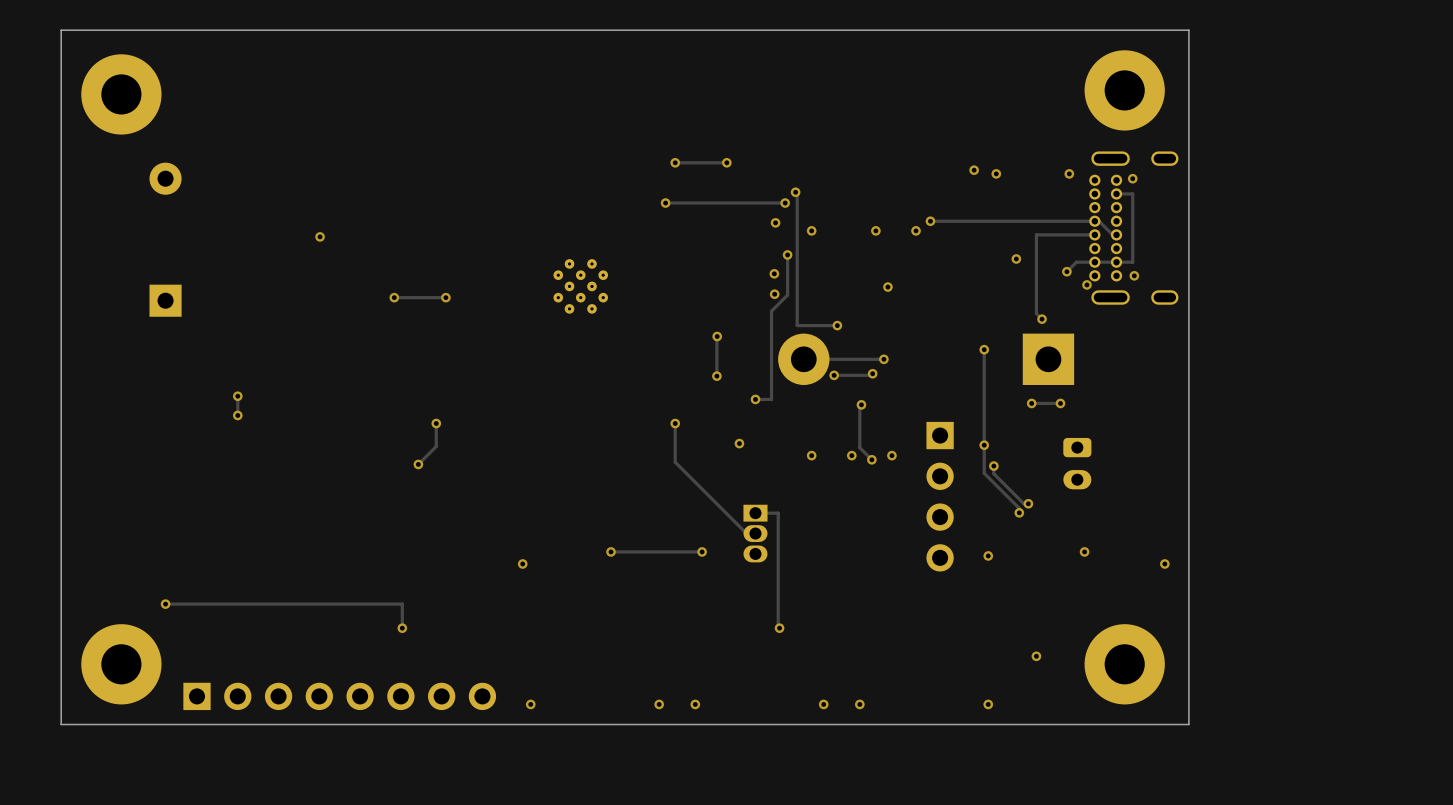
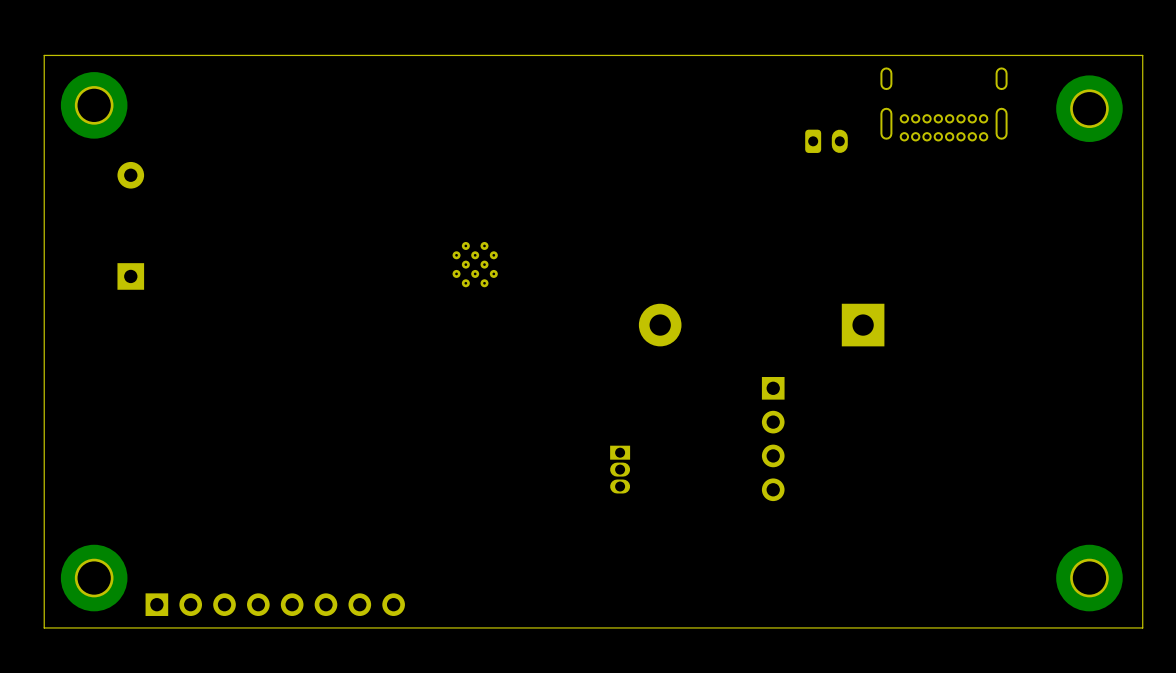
board edge: (61, 34) (61, 30) (1188, 30) (1188, 724) -> (44, 55) (1142, 55) (1142, 627) (979, 627)
part position: (1124, 90) -> (1089, 108)
via: (675, 162) -> none
track: (726, 162) (675, 162) -> none
via: (726, 162) -> none
via: (974, 170) -> none
via: (996, 173) -> none
via: (1069, 173) -> none
via: (1132, 178) -> none
track: (795, 192) (797, 193) (797, 325) (837, 325) -> none
via: (795, 192) -> none
track: (1116, 193) (1132, 193) (1132, 262) (1076, 262) (1066, 271) -> none
via: (665, 203) -> none
track: (785, 203) (665, 203) -> none
via: (785, 203) -> none
track: (930, 221) (1099, 221) (1113, 234) -> none
via: (930, 221) -> none
via: (775, 222) -> none
part rotation: 0° (1133, 228) -> 90° counterclockwise (943, 104)
part position: (1133, 228) -> (943, 104)
via: (811, 230) -> none
via: (875, 230) -> none
via: (916, 230) -> none
track: (1092, 234) (1036, 234) (1036, 313) (1042, 319) -> none
via: (320, 236) -> none
track: (787, 254) (787, 295) (771, 311) (771, 399) (755, 399) -> none
via: (787, 254) -> none
via: (1016, 258) -> none
via: (1066, 271) -> none
via: (774, 273) -> none
via: (1134, 275) -> none
via: (1086, 284) -> none
via: (887, 287) -> none
via: (774, 294) -> none
via: (394, 297) -> none
track: (445, 297) (394, 297) -> none
via: (445, 297) -> none
via: (1042, 319) -> none
via: (837, 325) -> none
track: (717, 336) (716, 376) -> none
via: (717, 336) -> none
track: (984, 349) (984, 473) (1019, 508) (1019, 512) -> none
via: (984, 349) -> none
track: (883, 359) (803, 359) -> none
via: (883, 359) -> none
track: (872, 373) (871, 375) (834, 375) -> none
via: (872, 373) -> none
via: (834, 375) -> none
via: (716, 376) -> none
track: (237, 396) (237, 415) -> none
via: (237, 396) -> none
via: (755, 399) -> none
via: (1031, 403) -> none
track: (1060, 403) (1031, 403) -> none
via: (1060, 403) -> none
via: (861, 404) -> none
track: (859, 405) (859, 447) (871, 459) -> none
via: (237, 415) -> none
track: (436, 423) (436, 446) (418, 464) -> none
via: (436, 423) -> none
track: (675, 423) (675, 462) (746, 533) (755, 533) -> none
via: (675, 423) -> none
via: (739, 443) -> none
via: (984, 445) -> none
via: (811, 455) -> none
via: (851, 455) -> none
via: (891, 455) -> none
via: (871, 459) -> none
part rotation: 0° (1077, 463) -> 90° counterclockwise (826, 141)
part position: (1077, 463) -> (826, 141)
via: (418, 464) -> none
track: (993, 466) (993, 473) (1023, 503) (1028, 503) -> none
via: (993, 466) -> none
via: (1028, 503) -> none
via: (1019, 512) -> none
track: (755, 513) (778, 513) (779, 628) -> none
via: (611, 551) -> none
track: (702, 551) (611, 551) -> none
via: (702, 551) -> none
via: (1084, 551) -> none
via: (988, 555) -> none
via: (522, 563) -> none
via: (1164, 563) -> none
track: (165, 604) (402, 604) (402, 628) -> none
via: (165, 604) -> none
via: (402, 628) -> none
via: (779, 628) -> none
via: (1036, 656) -> none
part position: (1124, 664) -> (1089, 578)
via: (530, 704) -> none
via: (659, 704) -> none
via: (695, 704) -> none
via: (823, 704) -> none
via: (859, 704) -> none
via: (988, 704) -> none

